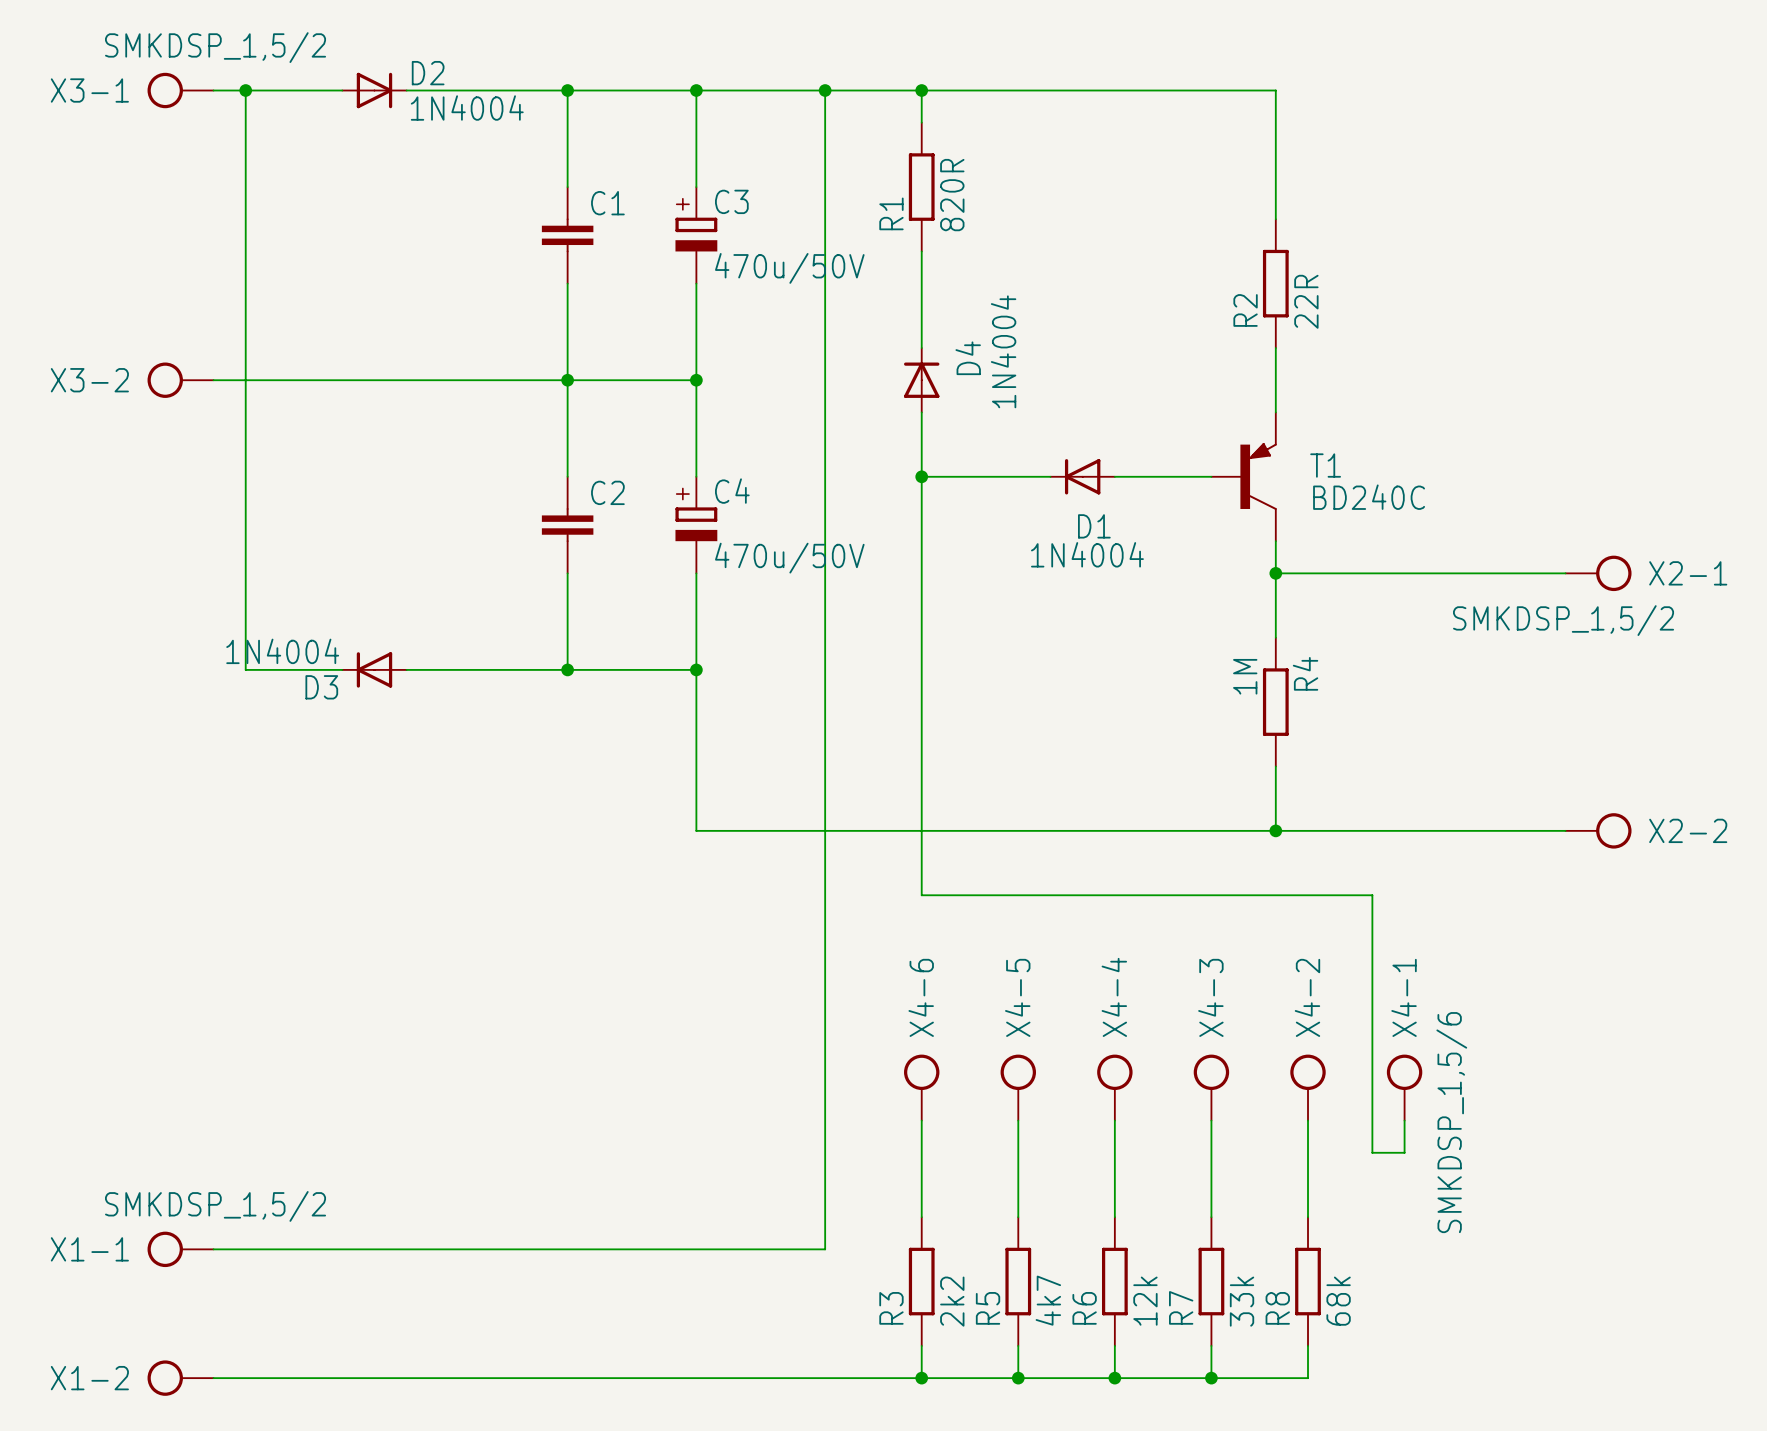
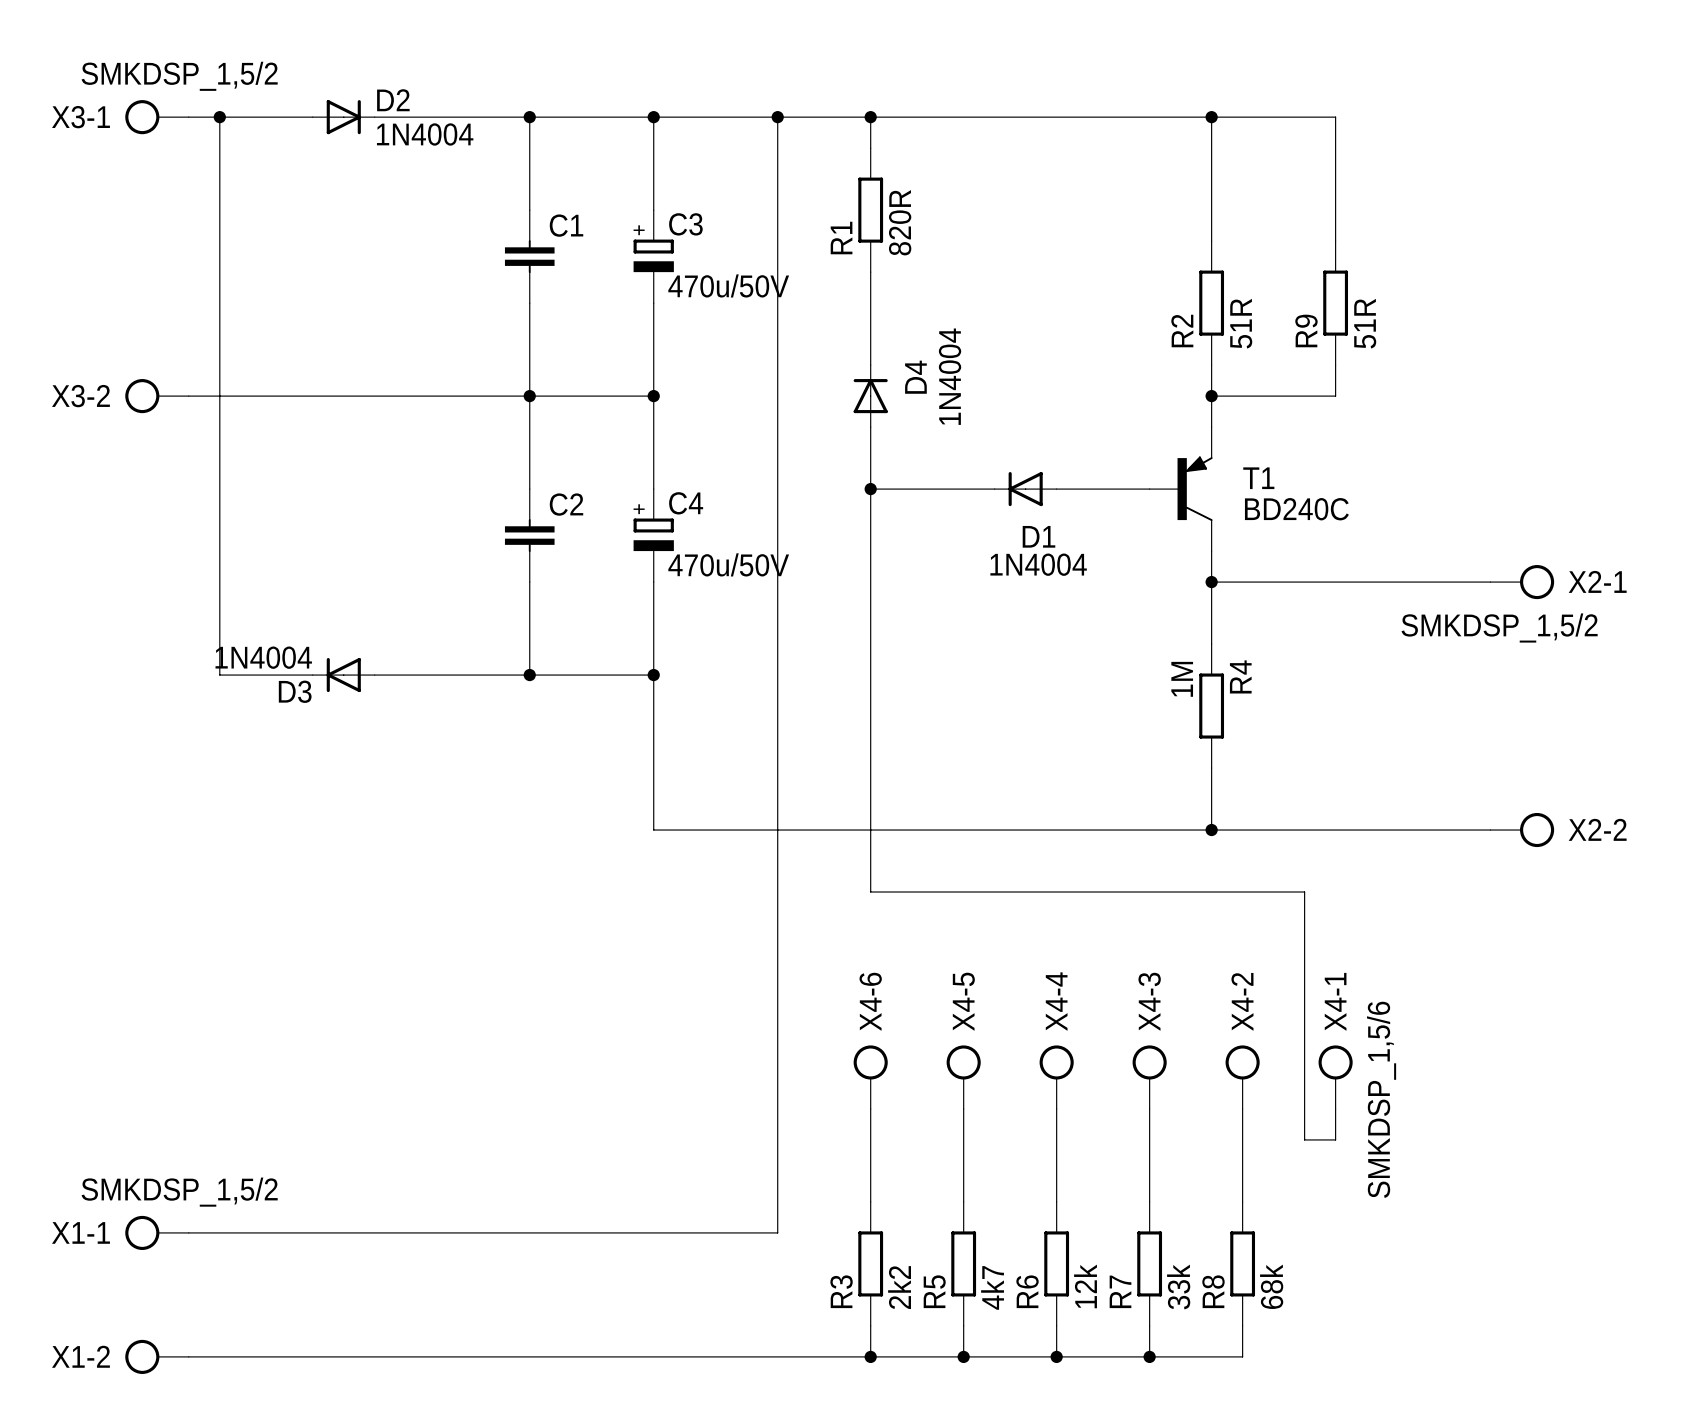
wire: none -> (1211, 117) (1335, 117) (1335, 241)
junction: none -> (1211, 117)
R9: none -> 51R (1335, 303)
R2 value: 22R (1306, 301) -> 51R (1241, 323)
wire: none -> (1335, 365) (1335, 396) (1211, 396)
junction: none -> (1211, 396)

